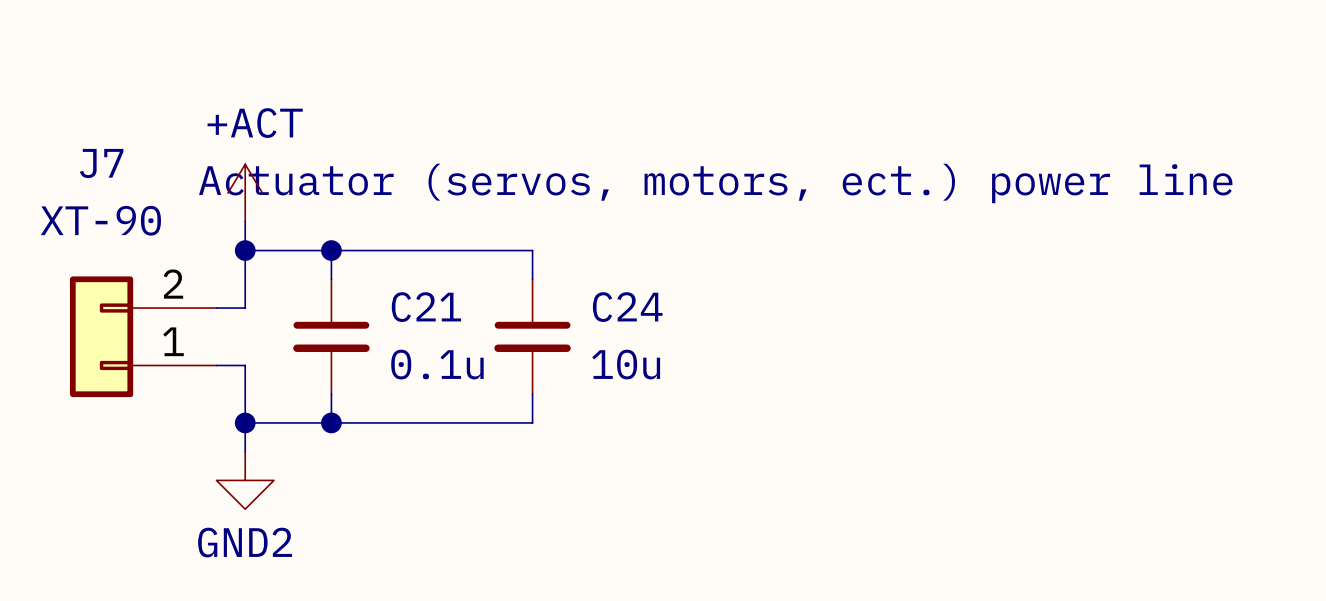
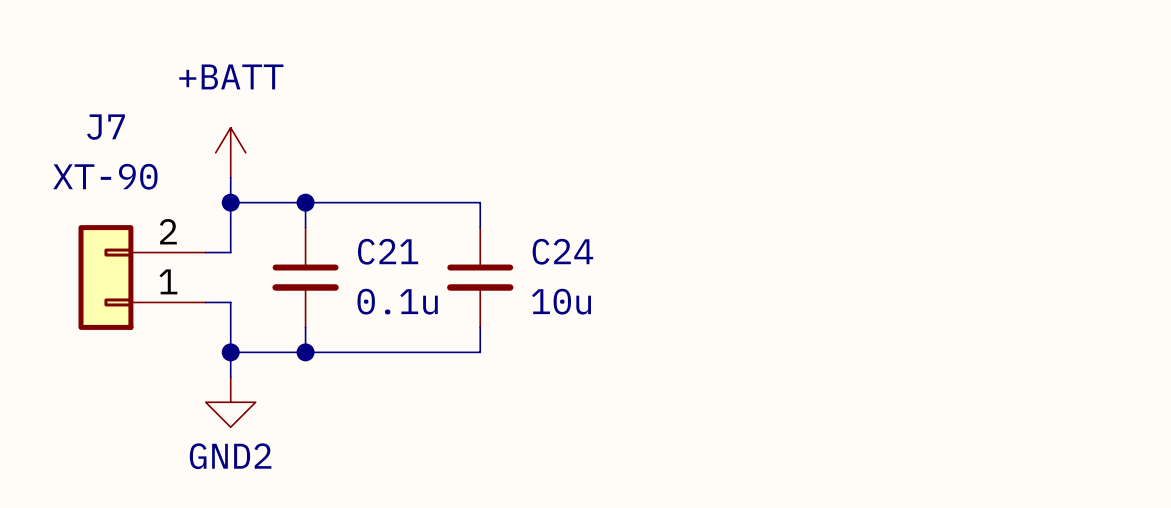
text: Actuator (servos, motors, ect.) power line (715, 183) -> none
power symbol: +ACT (245, 193) -> +BATT (230, 152)

